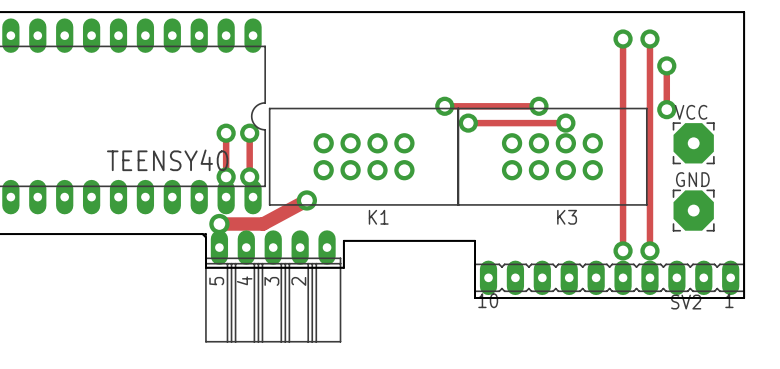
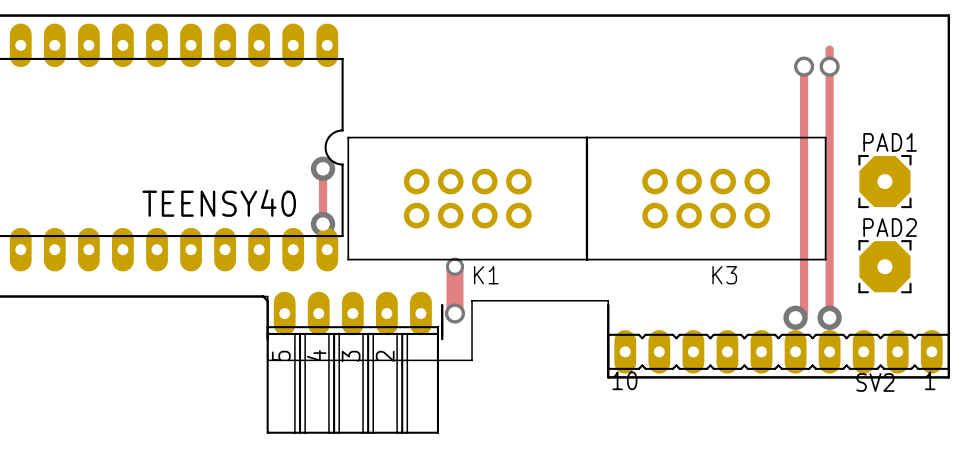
track: (623, 39) (623, 250) -> none
via: (623, 39) -> none
via: (649, 39) -> none
track: none -> (804, 66) (804, 313)
via: none -> (804, 66)
via: none -> (829, 66)
track: (666, 65) (666, 109) -> none
via: (666, 65) -> none
track: (444, 106) (538, 106) -> none
via: (444, 106) -> none
via: (538, 106) -> none
via: (666, 109) -> none
VCC name: VCC (691, 112) -> PAD1 (890, 142)
track: (468, 123) (565, 123) -> none
via: (468, 123) -> none
via: (565, 123) -> none
track: (226, 133) (226, 176) -> none
via: (226, 133) -> none
via: (226, 176) -> none
GND name: GND (692, 179) -> PAD2 (890, 227)
track: (306, 200) (263, 224) (219, 224) -> none
via: (306, 200) -> none
track: none -> (454, 266) (454, 313)
via: none -> (454, 266)
via: (219, 224) -> none
board edge: (343, 240) (475, 240) (343, 240) -> none
board edge: none -> (608, 305) (608, 300) (472, 300) (472, 360) (267, 360) (267, 339)
via: none -> (454, 313)
board edge: (343, 267) (205, 267) (343, 267) -> none

